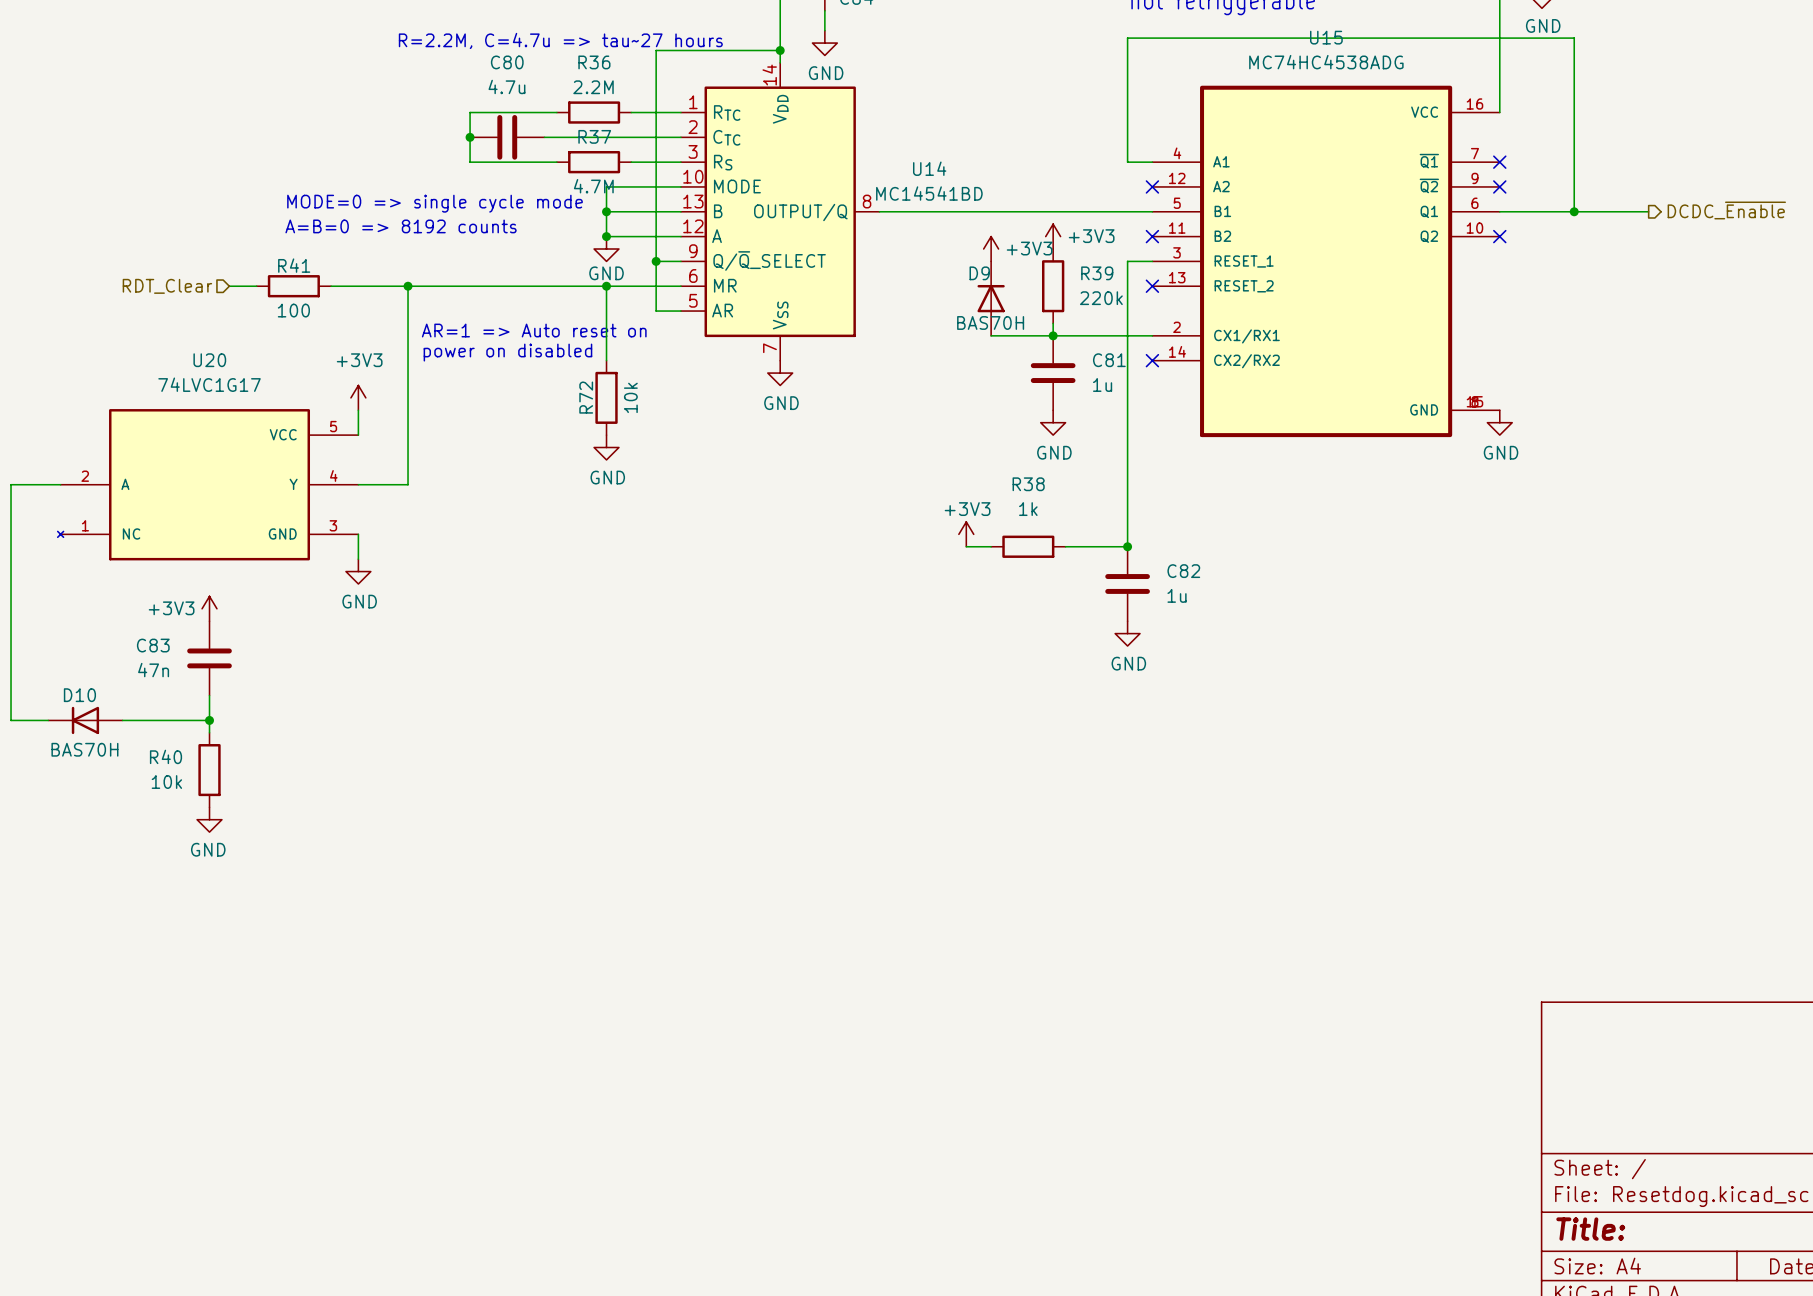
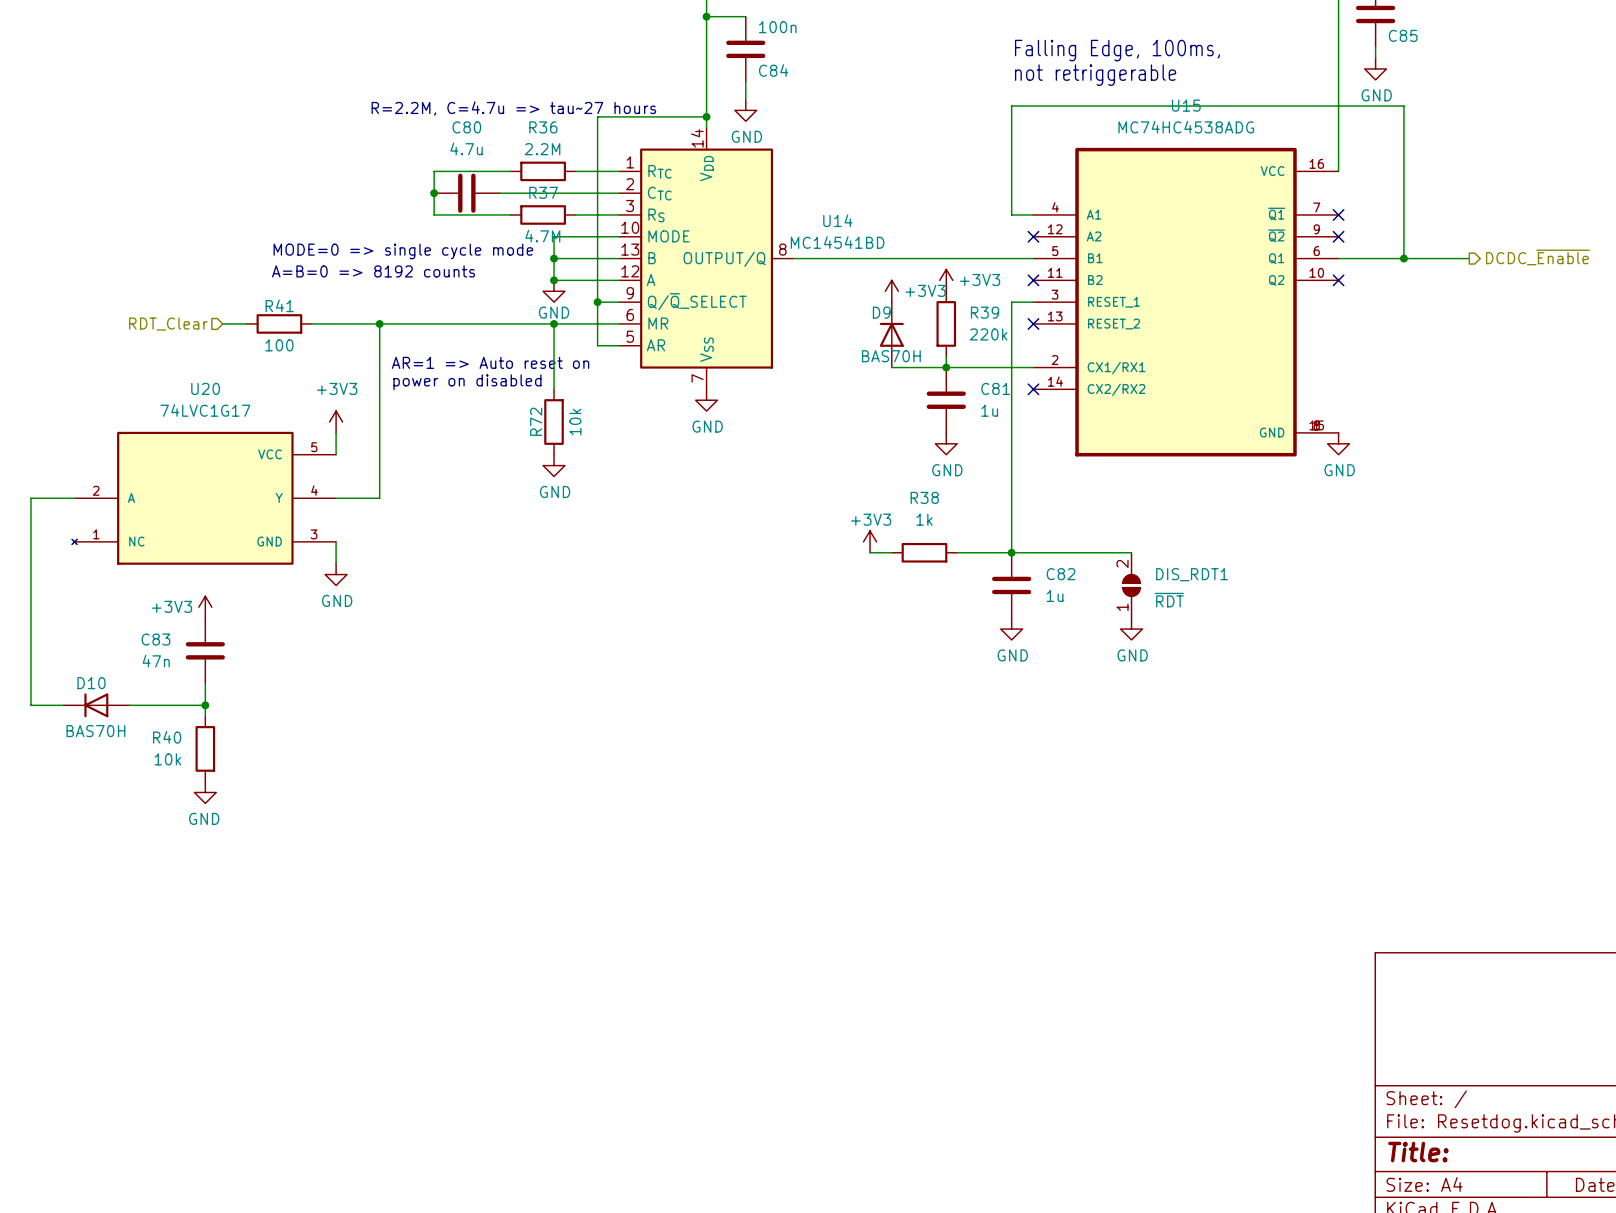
wire: none -> (1011, 552) (1131, 552)
DIS_RDT1: none -> ~{RDT} (1131, 585)
power symbol: none -> GND (1131, 629)

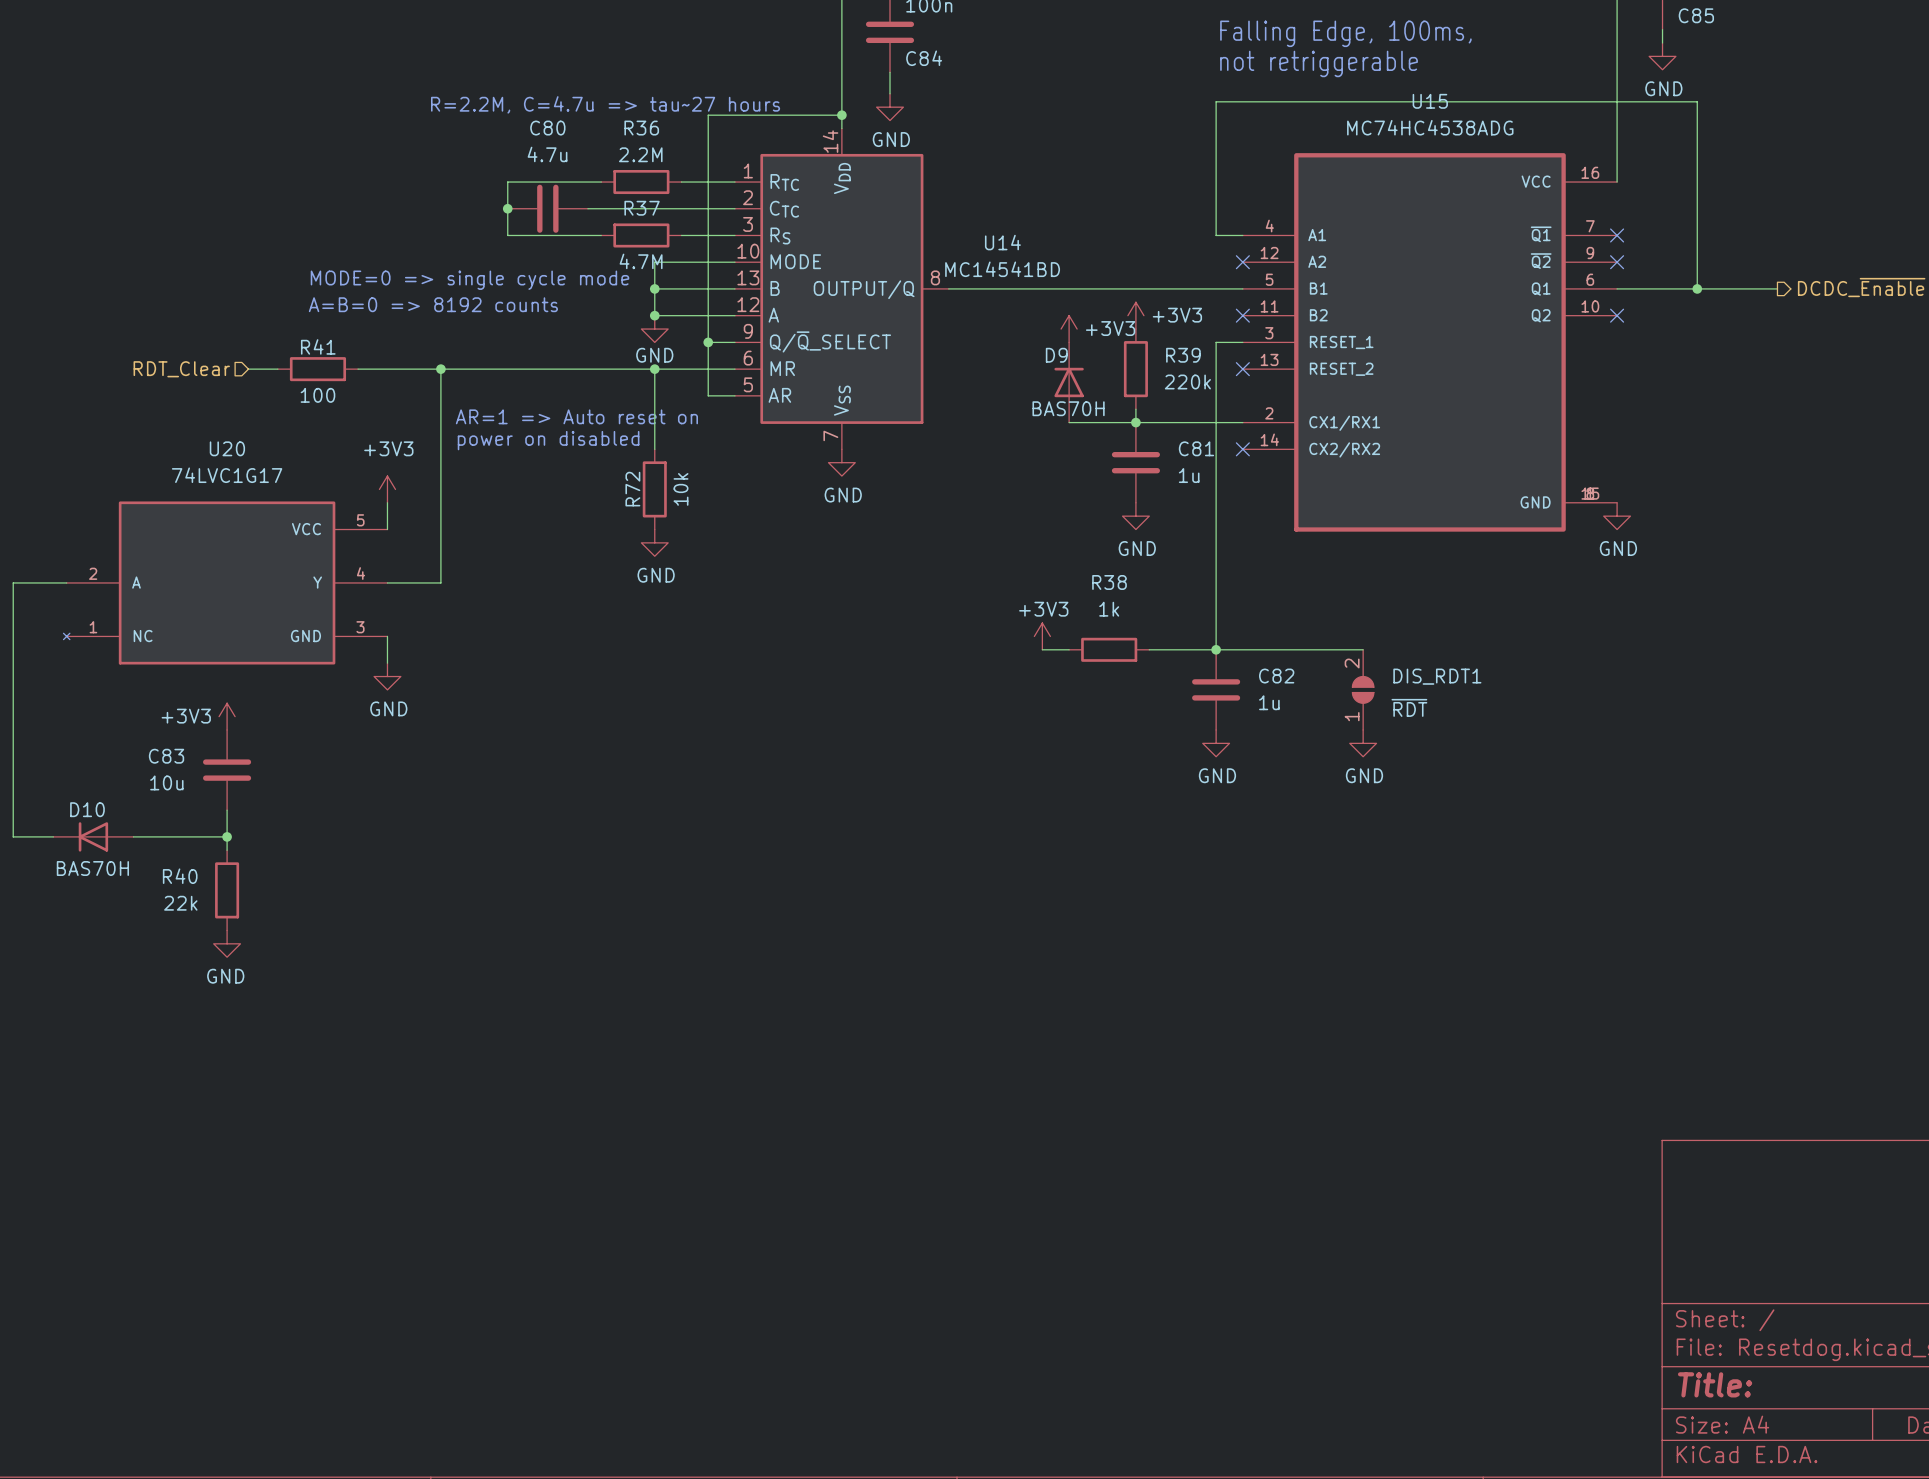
C83 value: 47n (156, 661) -> 10u (166, 782)
R40 value: 10k (167, 759) -> 22k (180, 903)

